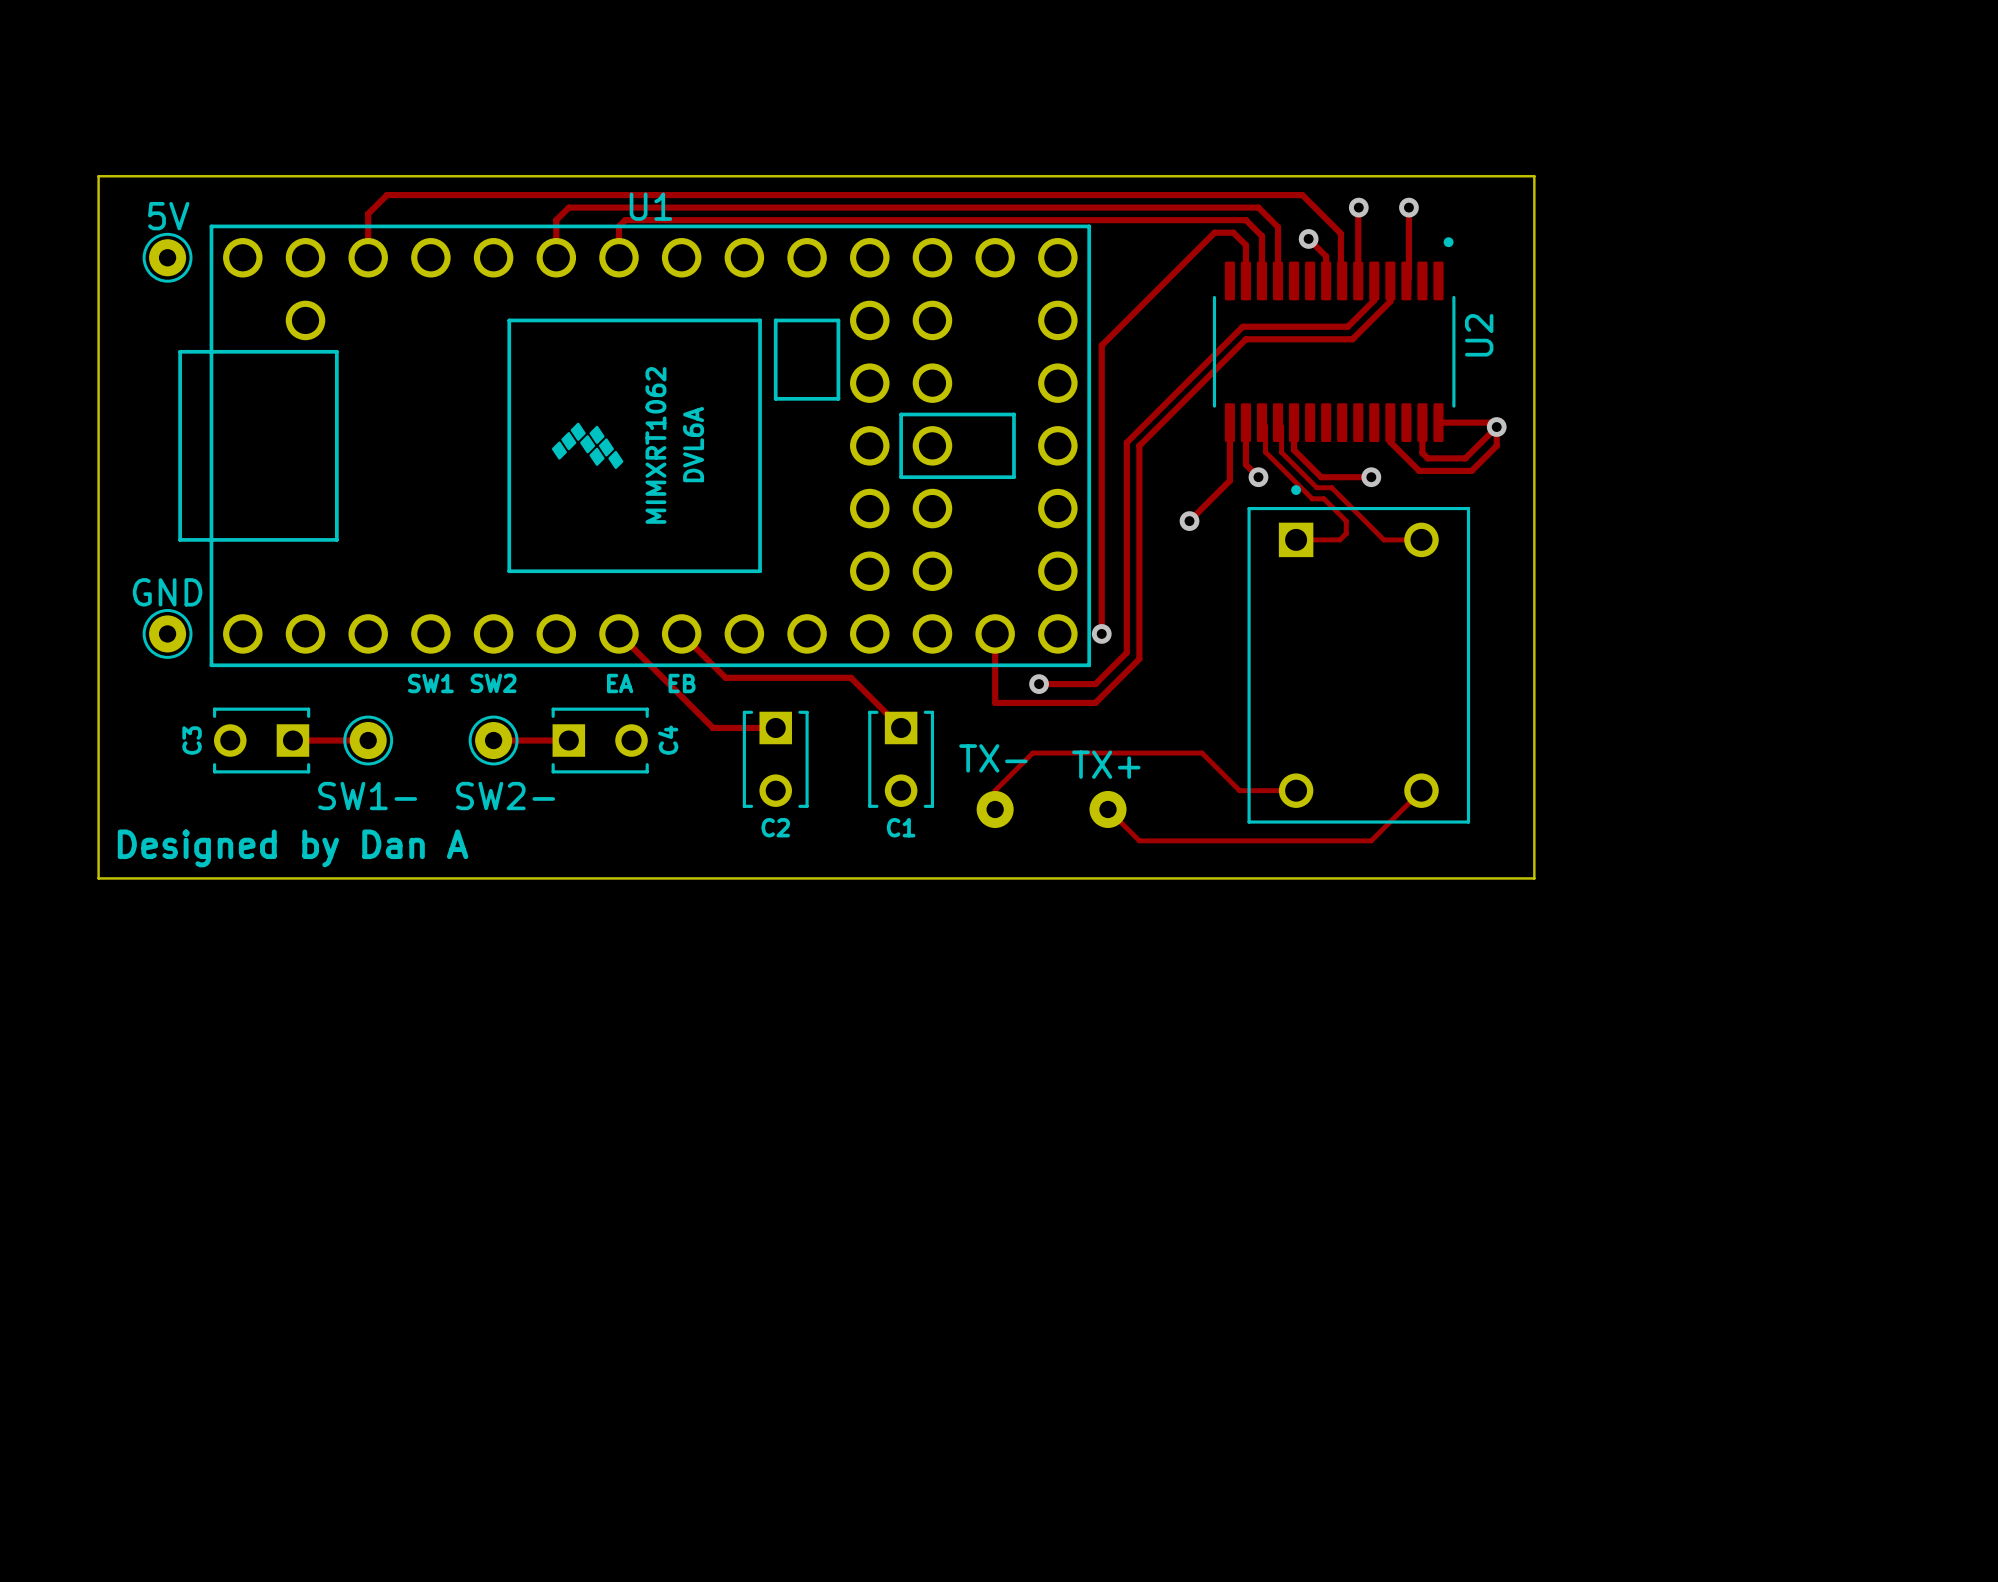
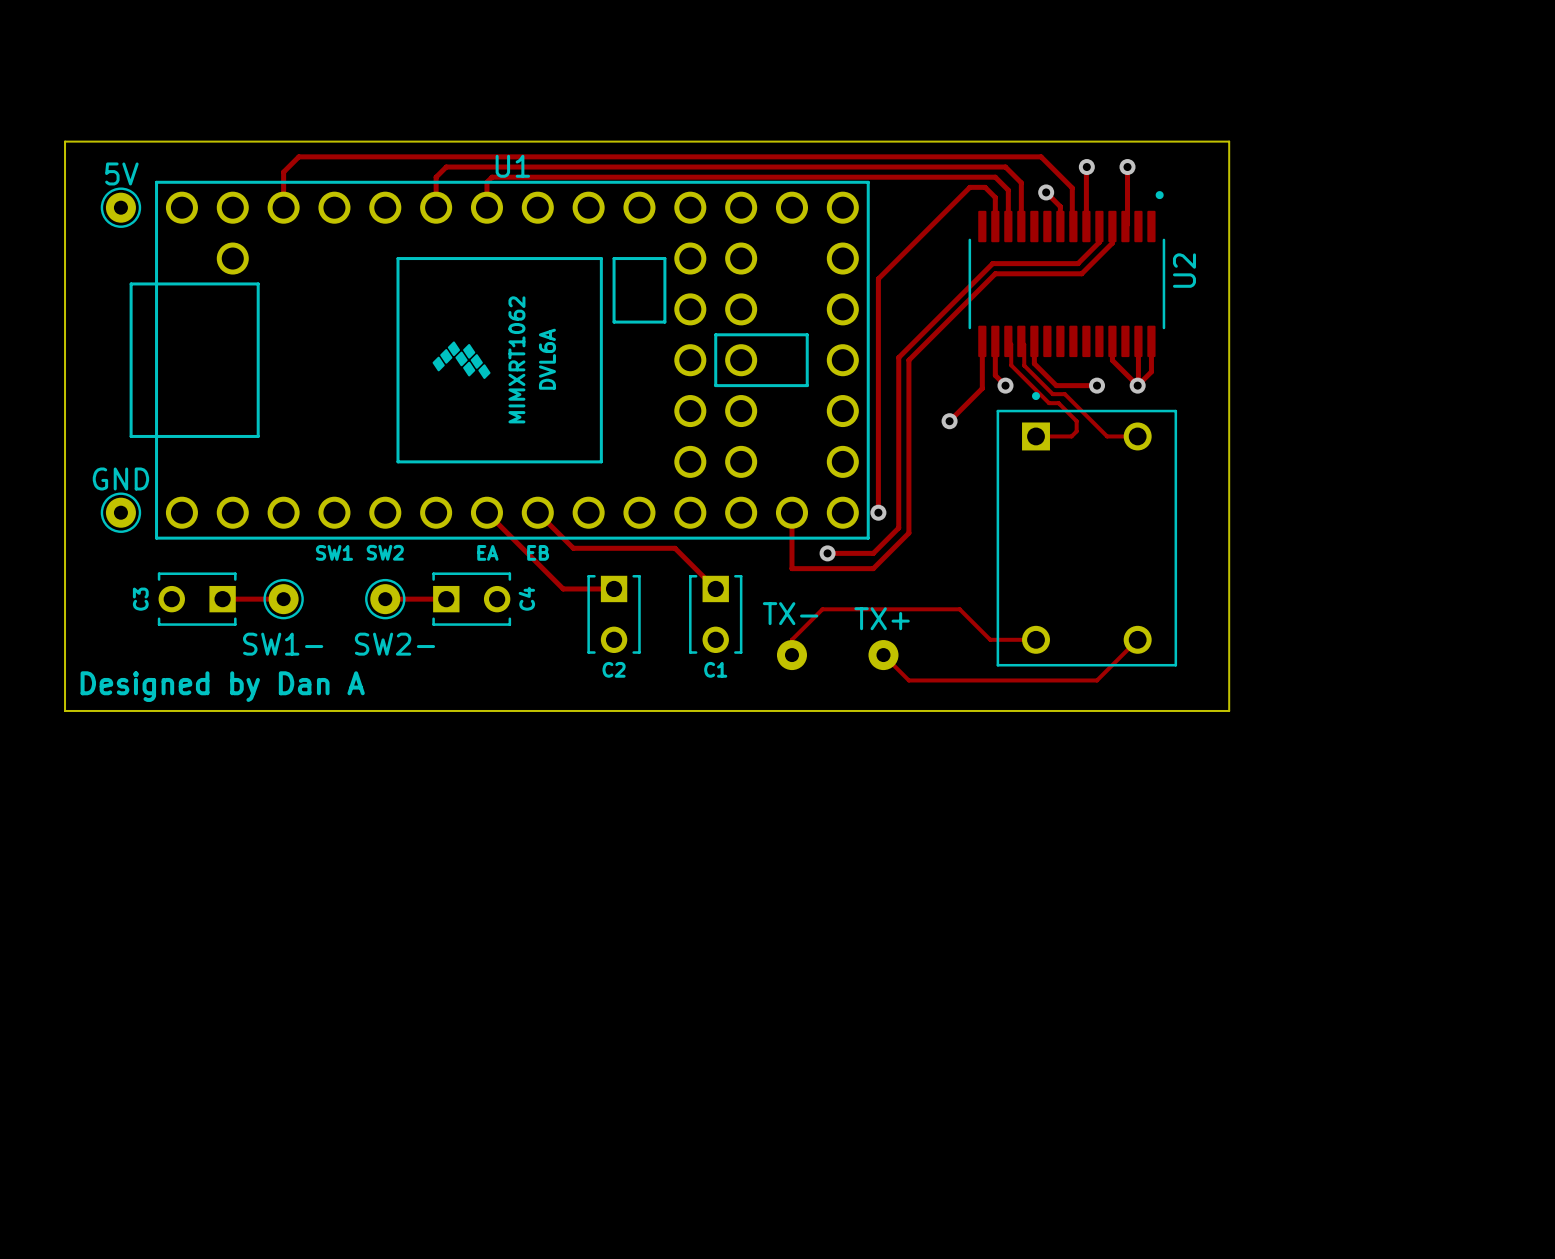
track: (1438, 422) (1492, 422) (1496, 427) -> none
track: (1496, 427) (1496, 445) (1471, 470) (1419, 470) (1390, 442) -> (1151, 341) (1151, 371) (1137, 385) (1112, 360) (1112, 357)
track: (1496, 427) (1465, 458) (1427, 458) (1422, 453) -> (1138, 384) (1138, 366)
via position: (1496, 427) -> (1137, 385)

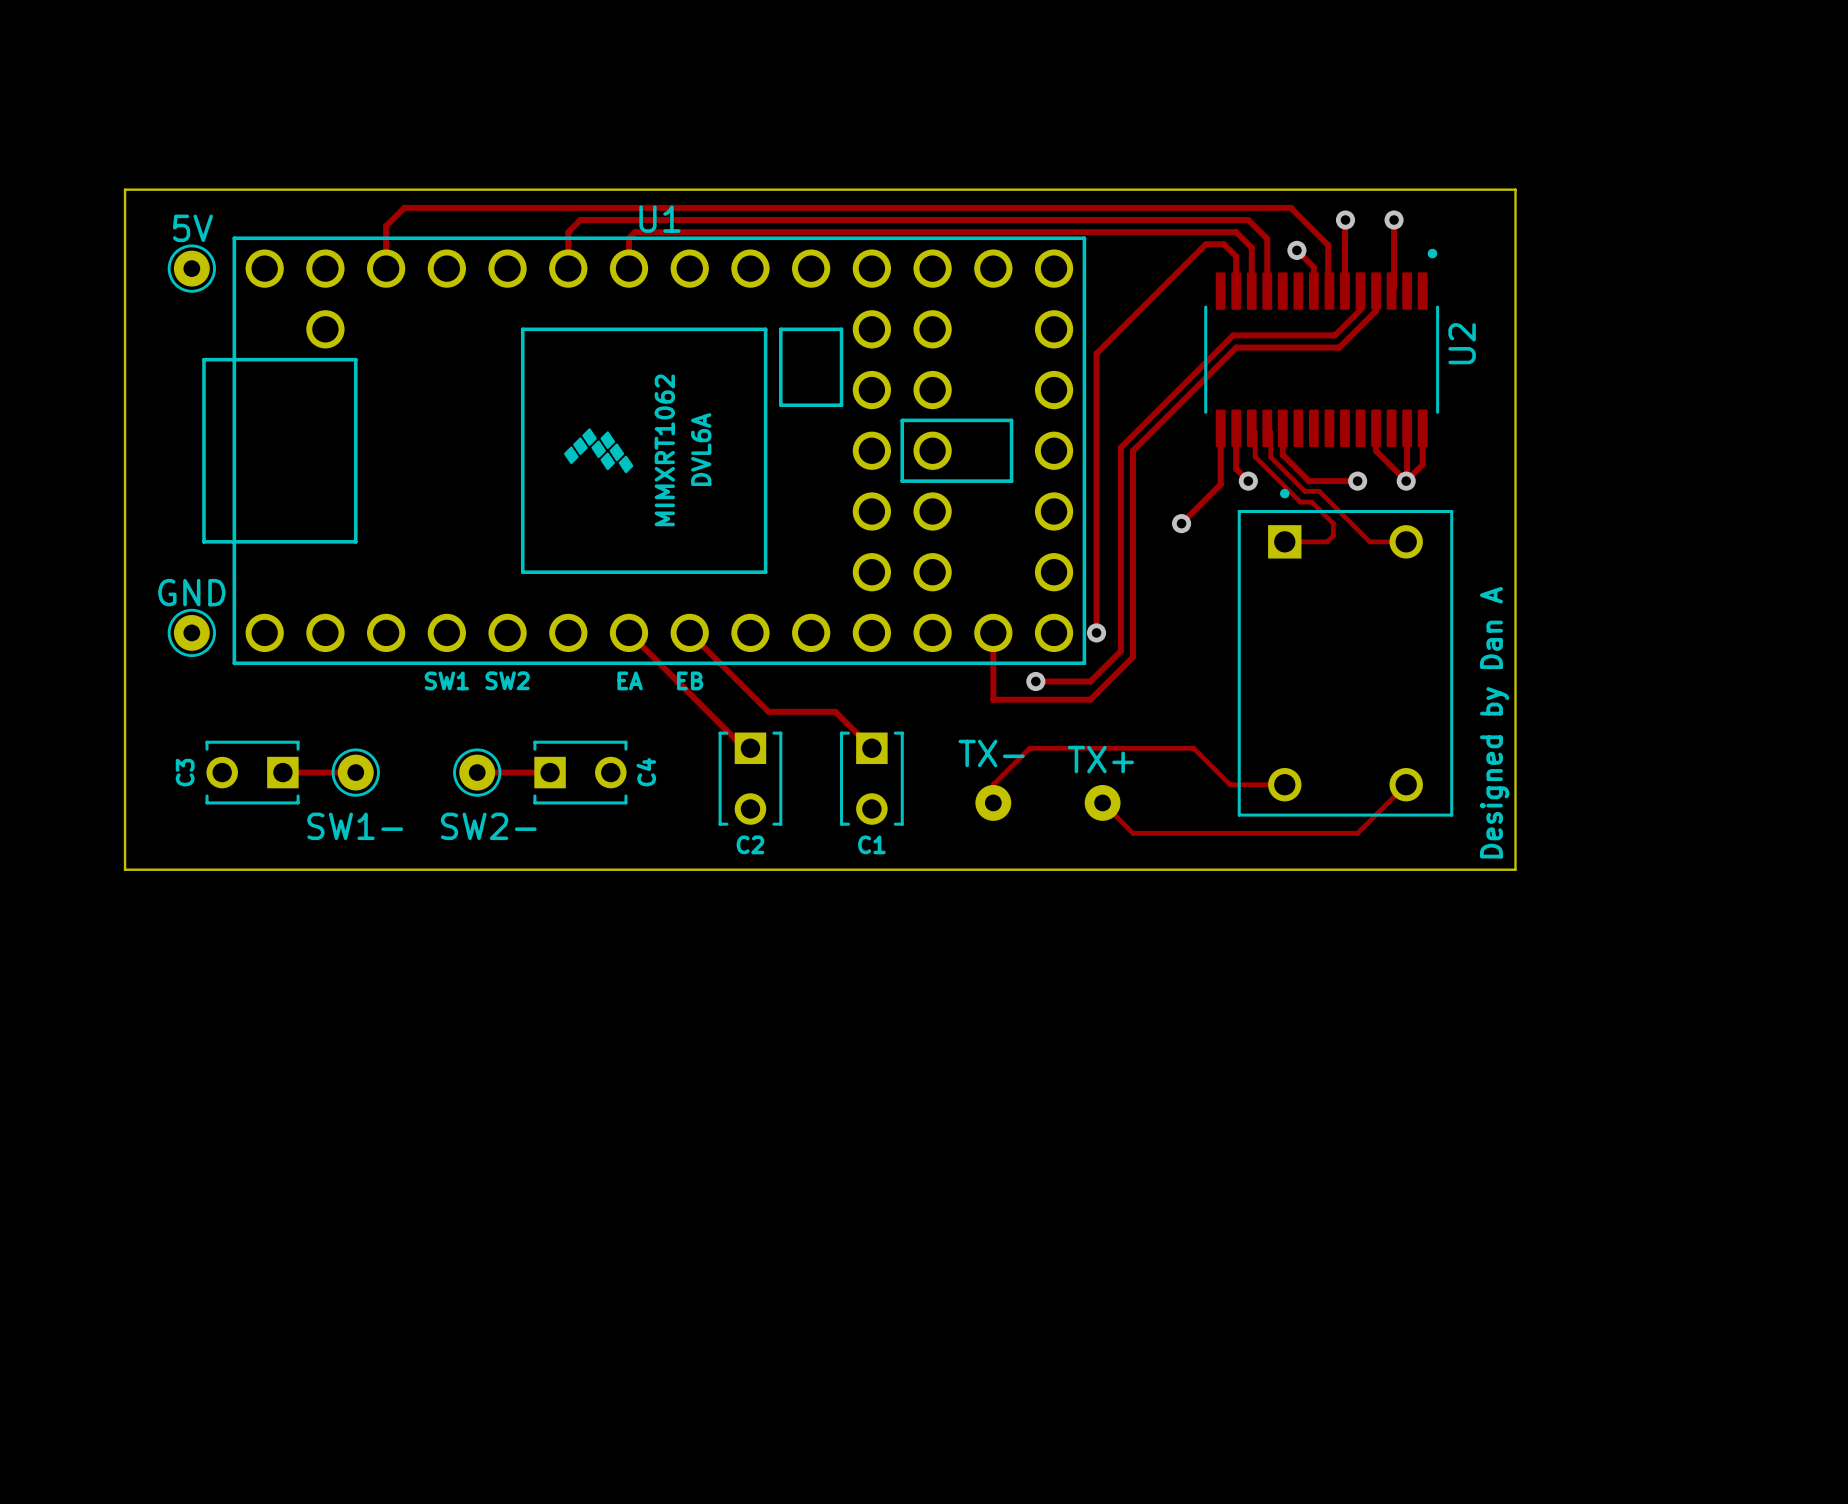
track: (573, 548) (675, 548) (715, 588) -> (732, 675) (768, 711) (835, 711) (871, 748)
text: none -> Designed by Dan A (1494, 722)
track: (563, 588) (614, 588) -> (720, 723) (744, 748) (750, 748)
C3 position: (197, 599) -> (252, 772)
track: (222, 599) (283, 599) -> (282, 772) (355, 772)
SW1- position: (283, 599) -> (355, 772)
track: (385, 599) (446, 599) -> (477, 772) (550, 772)
SW2- position: (385, 599) -> (477, 772)
C4 position: (471, 599) -> (580, 772)
C2 position: (614, 614) -> (750, 778)
C1 position: (715, 614) -> (871, 778)
text: Designed by Dan A (222, 686) -> none

